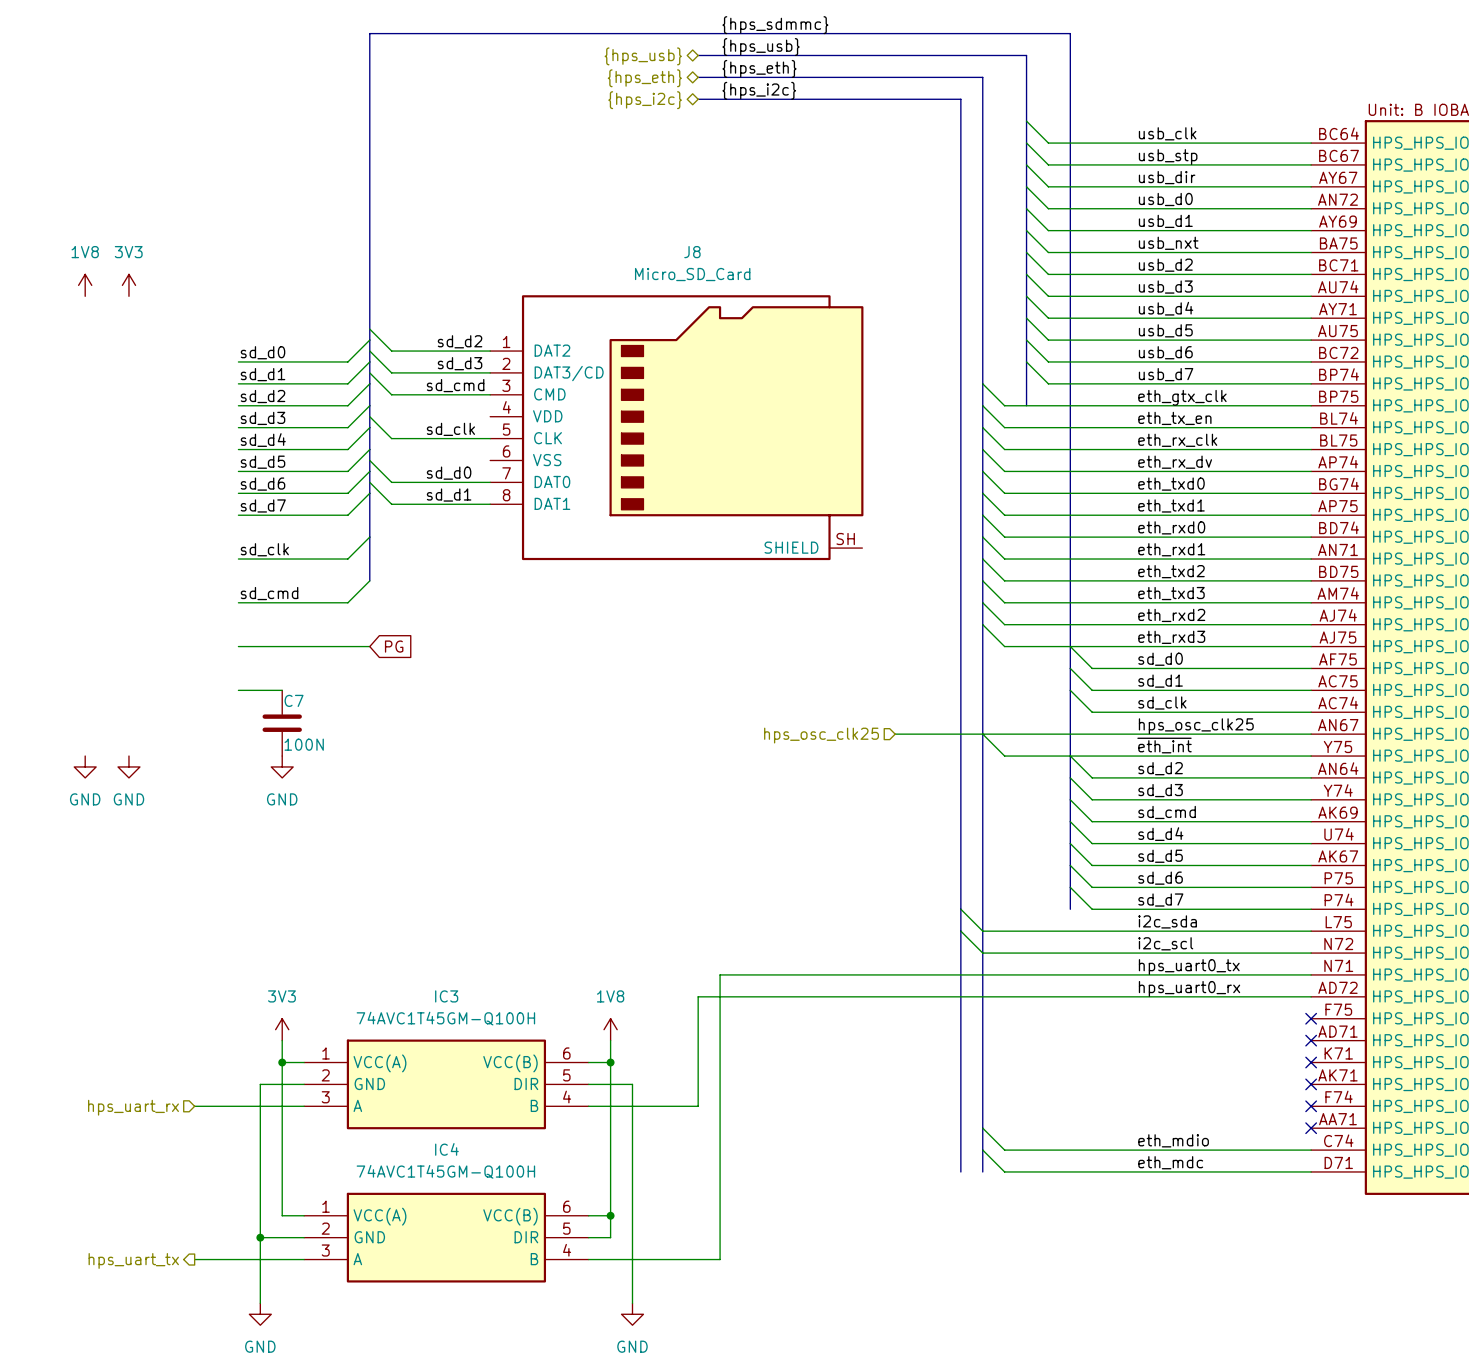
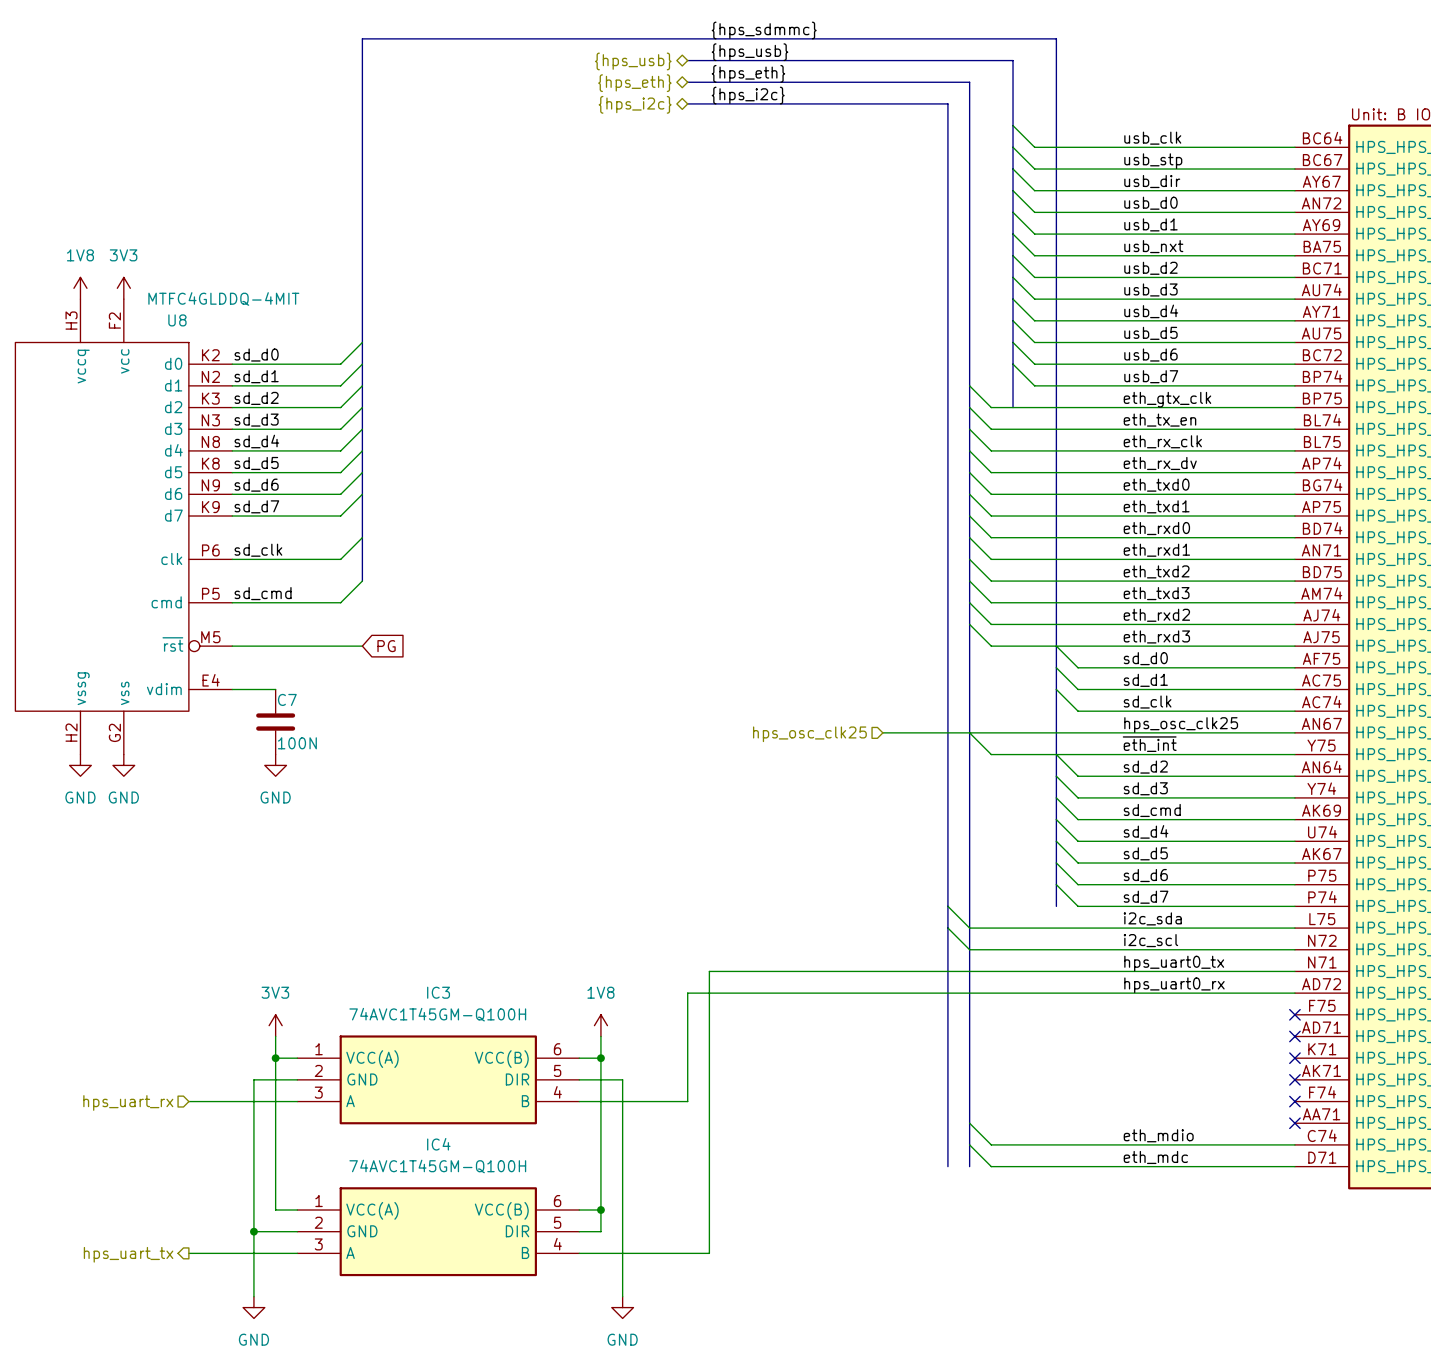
wire: (369, 329) (391, 351) (490, 351) -> none
label: sd_d2 (460, 341) -> none
wire: (369, 351) (391, 372) (490, 372) -> none
label: sd_d3 (460, 363) -> none
wire: (369, 372) (391, 394) (490, 394) -> none
label: sd_cmd (455, 385) -> none
wire: (369, 416) (391, 438) (490, 438) -> none
J8: Micro_SD_Card (676, 427) -> none
label: sd_clk (450, 429) -> none
wire: (369, 460) (391, 482) (490, 482) -> none
label: sd_d0 (449, 473) -> none
wire: (369, 482) (391, 504) (490, 504) -> none
label: sd_d1 (449, 495) -> none
U8: none -> MTFC4GLDDQ-4MIT (123, 526)

